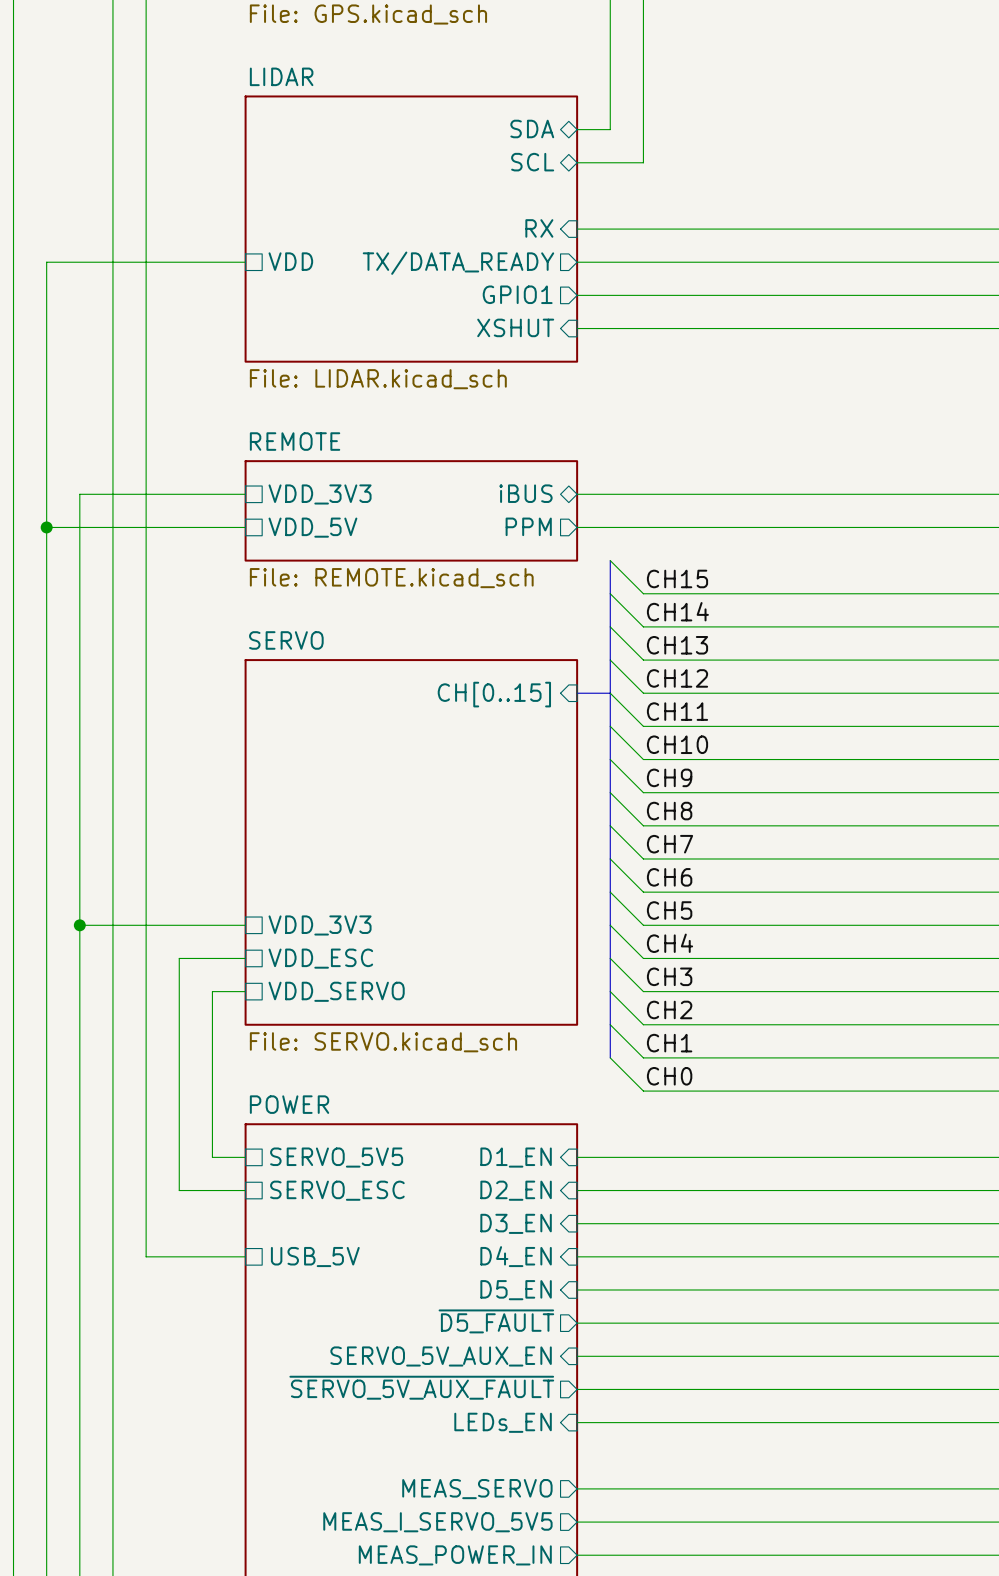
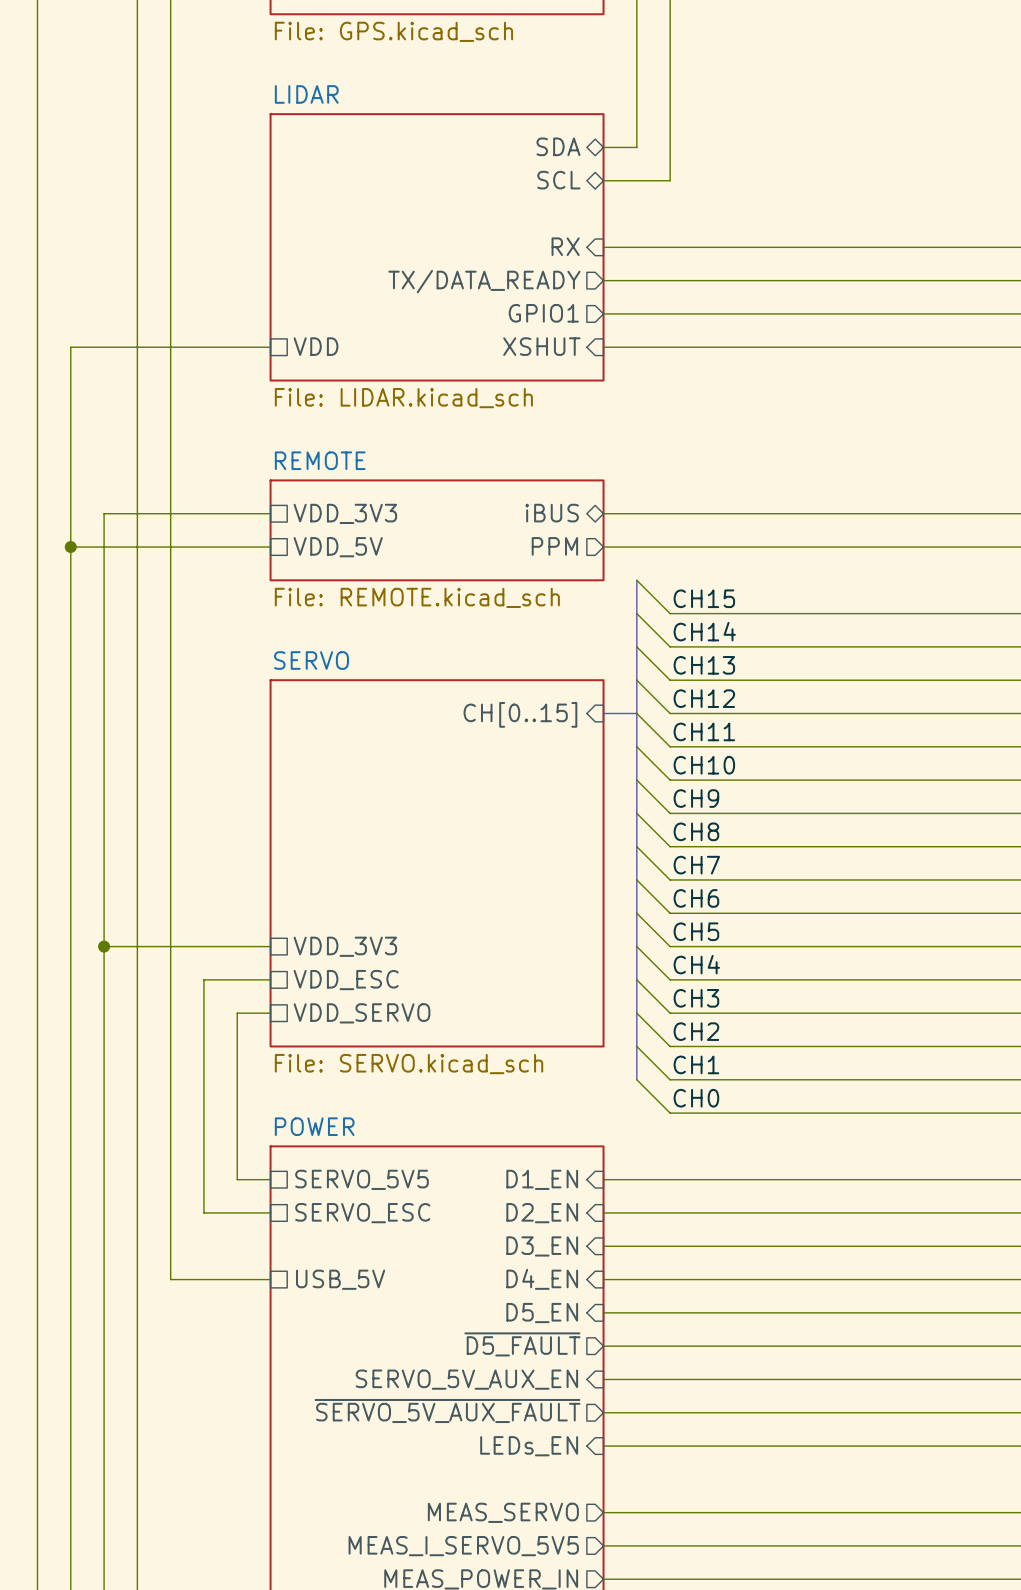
sheet pin position: VDD (290, 261) -> VDD (316, 346)
wire: (245, 262) (46, 262) (46, 328) -> (270, 347) (70, 347)

